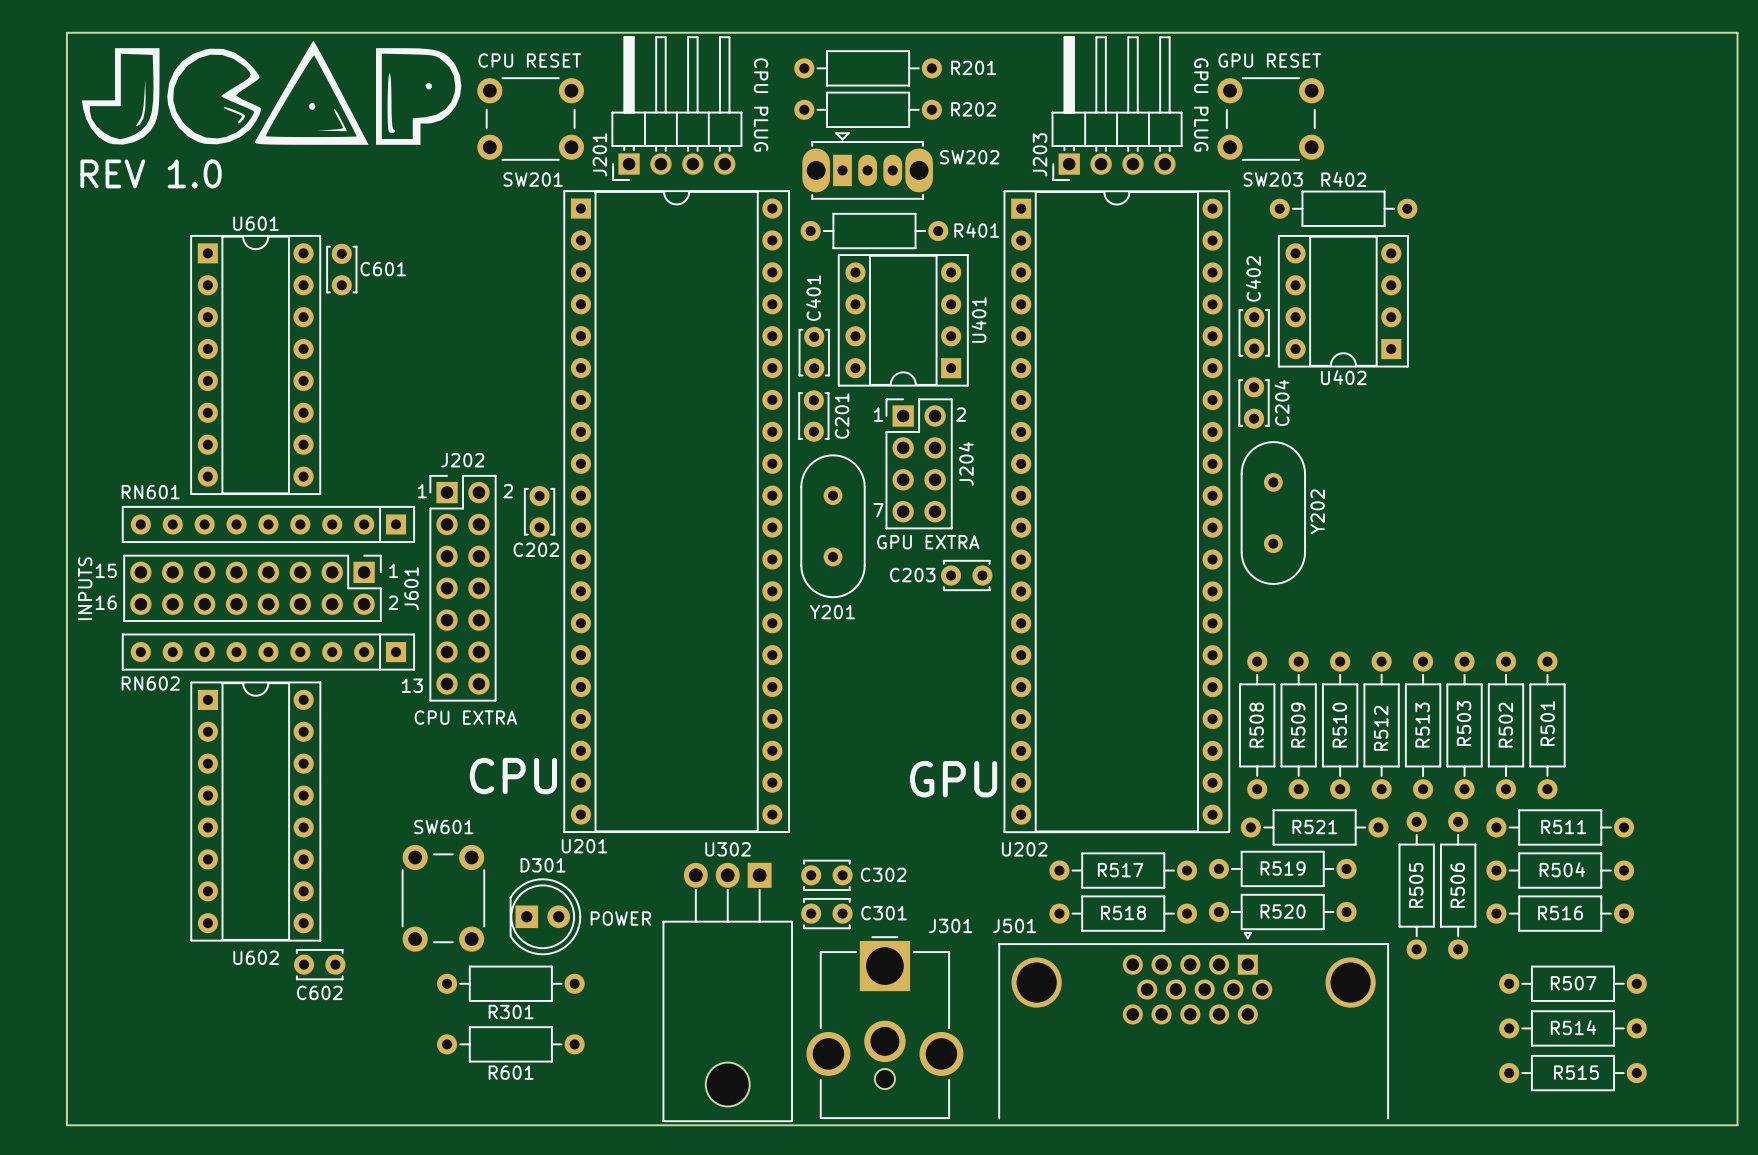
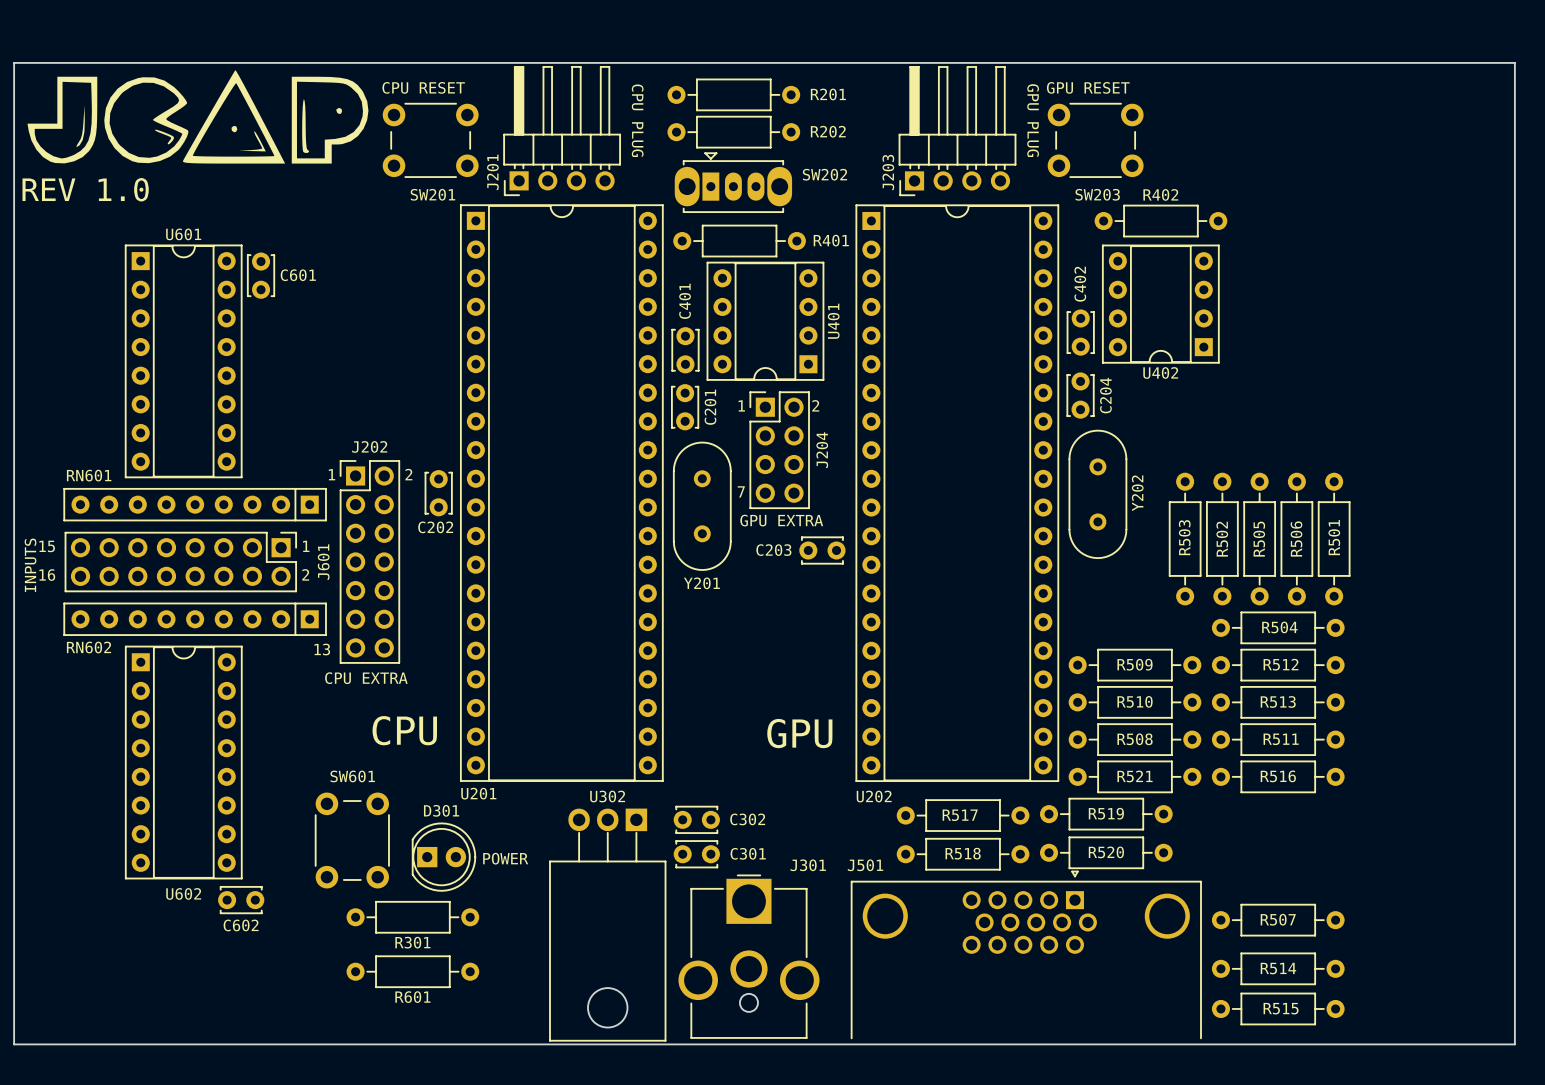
R508 rotation: 0° (1257, 725) -> 90° clockwise (1134, 739)
R509 rotation: 0° (1298, 725) -> 90° clockwise (1134, 665)
R510 rotation: 0° (1340, 725) -> 90° clockwise (1134, 702)
R512 rotation: 0° (1381, 725) -> 90° clockwise (1278, 665)
R512 position: (1381, 725) -> (1278, 665)
R513 rotation: 0° (1423, 725) -> 90° clockwise (1278, 702)
R503 position: (1464, 725) -> (1185, 539)
R502 position: (1506, 725) -> (1222, 539)
R501 position: (1547, 725) -> (1334, 539)
R511 position: (1560, 827) -> (1278, 739)
R504 position: (1560, 870) -> (1278, 627)
R505 position: (1416, 885) -> (1259, 539)
R506 position: (1458, 885) -> (1296, 539)
R516 position: (1560, 913) -> (1278, 776)
R507 position: (1572, 983) -> (1278, 920)
R514 position: (1572, 1028) -> (1278, 968)
R515 position: (1572, 1073) -> (1278, 1008)

